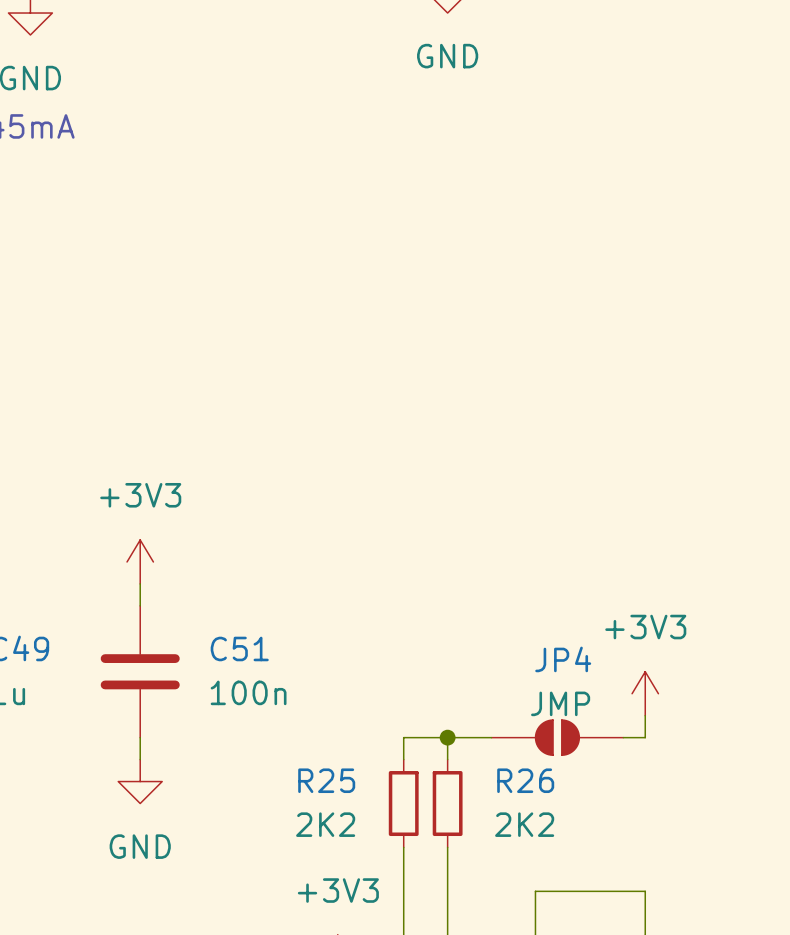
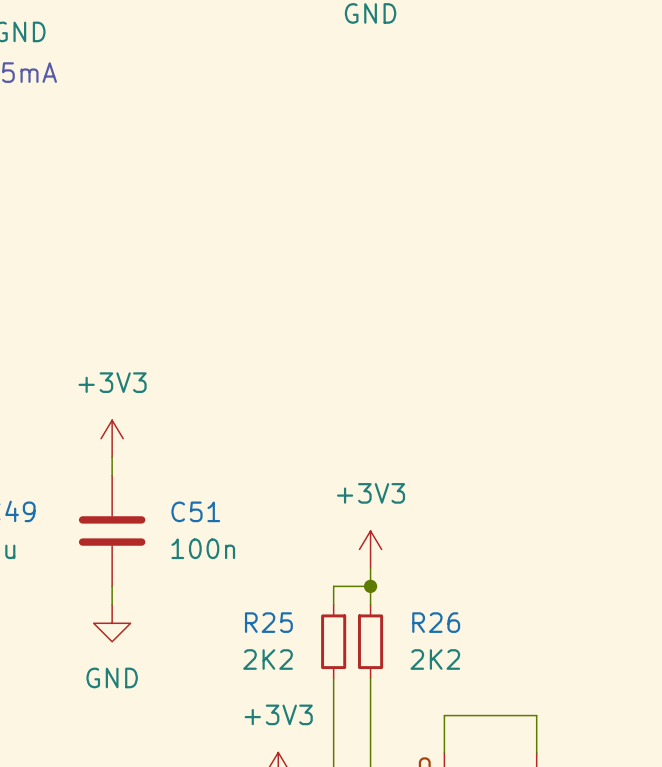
power symbol position: +3V3 (645, 693) -> +3V3 (370, 549)
wire: (645, 715) (645, 737) (623, 737) -> none
wire: (447, 737) (491, 737) -> (370, 586) (370, 567)
JP4: JMP (557, 737) -> none

